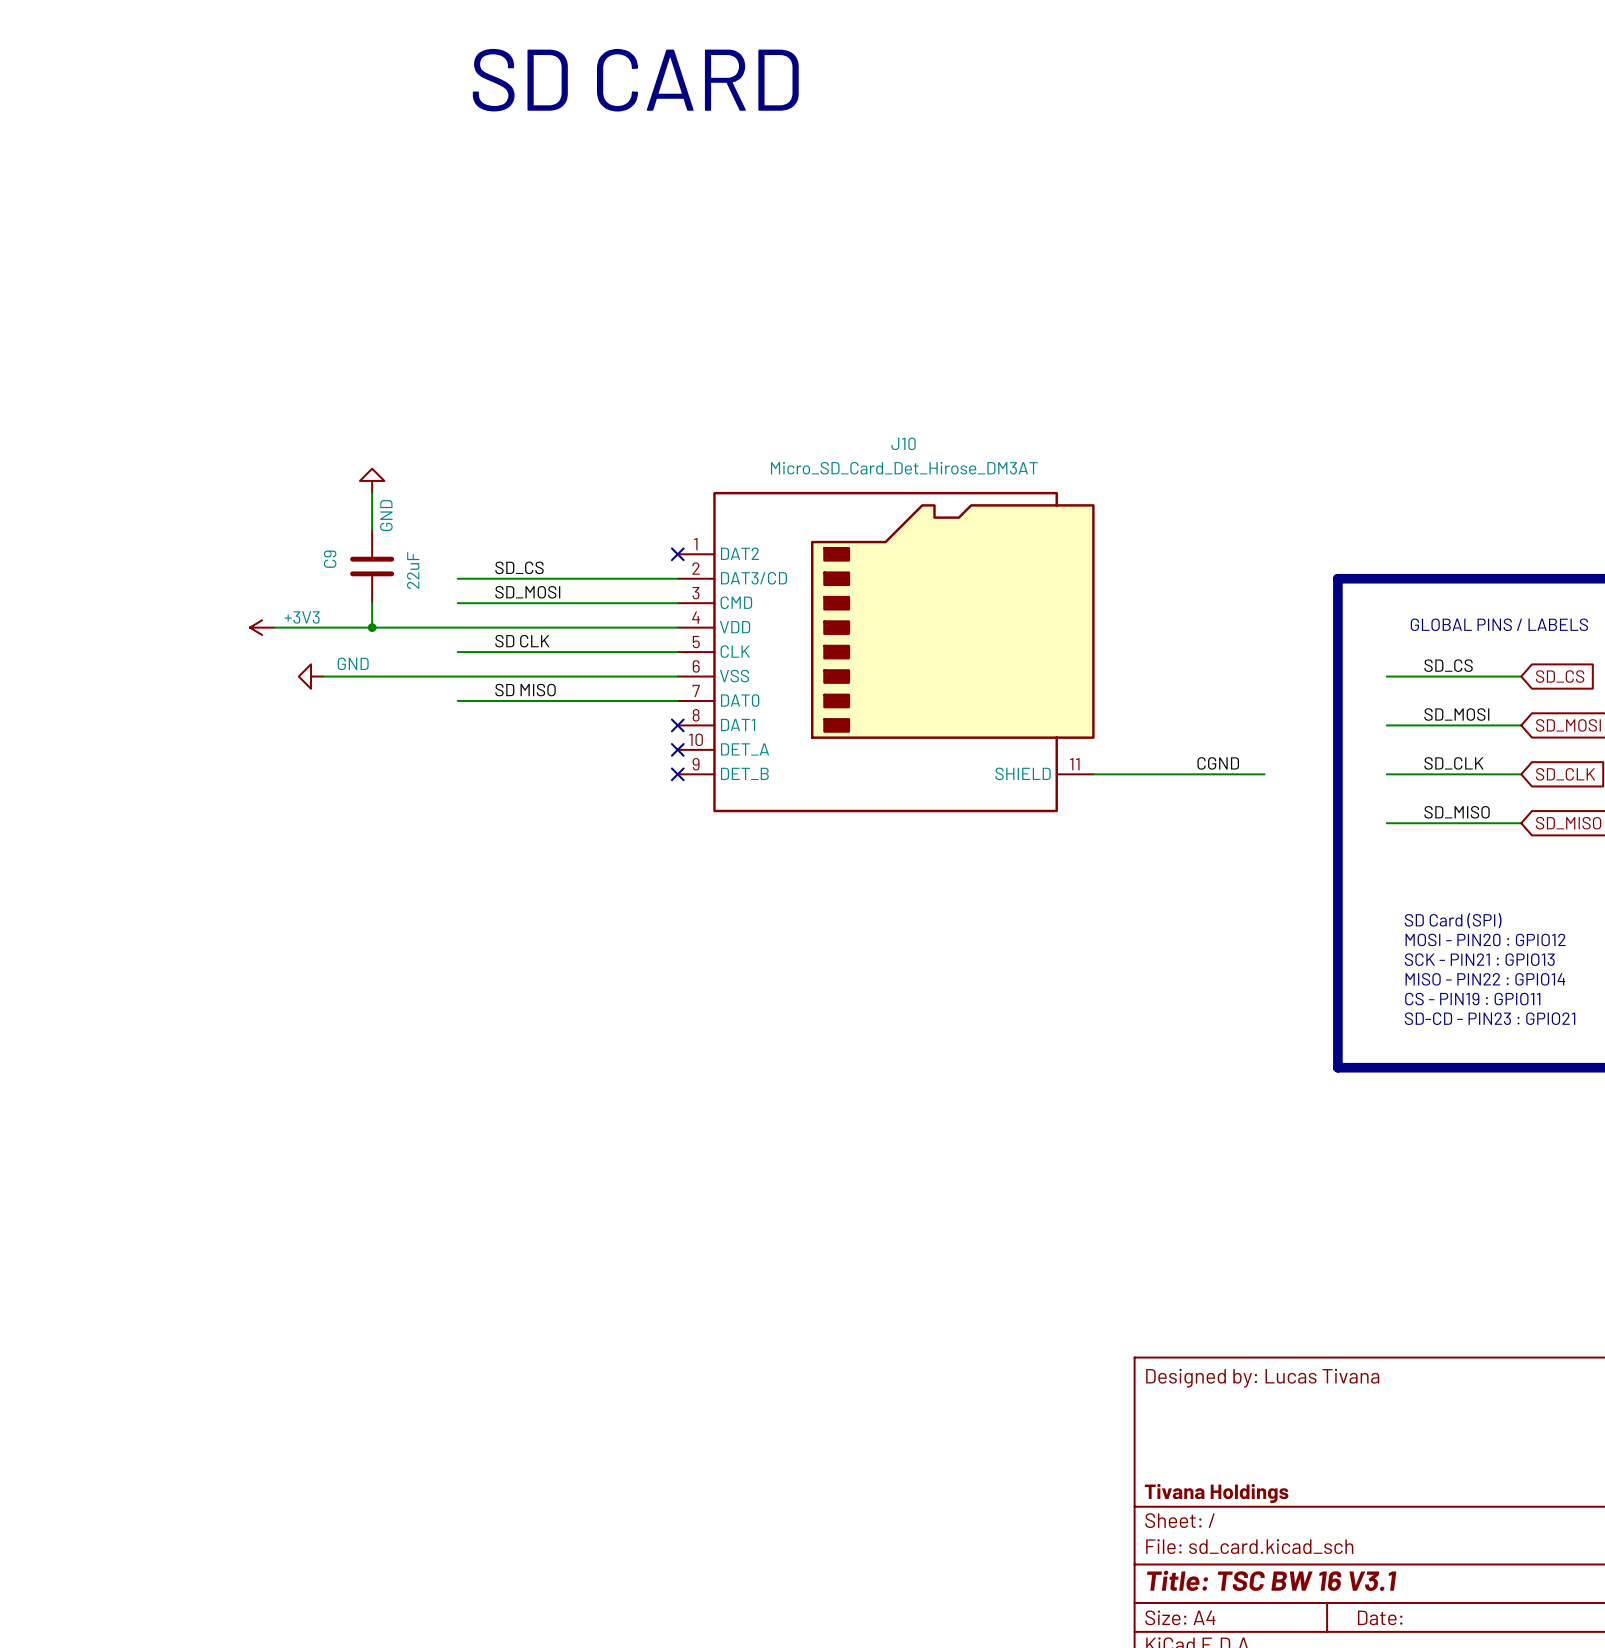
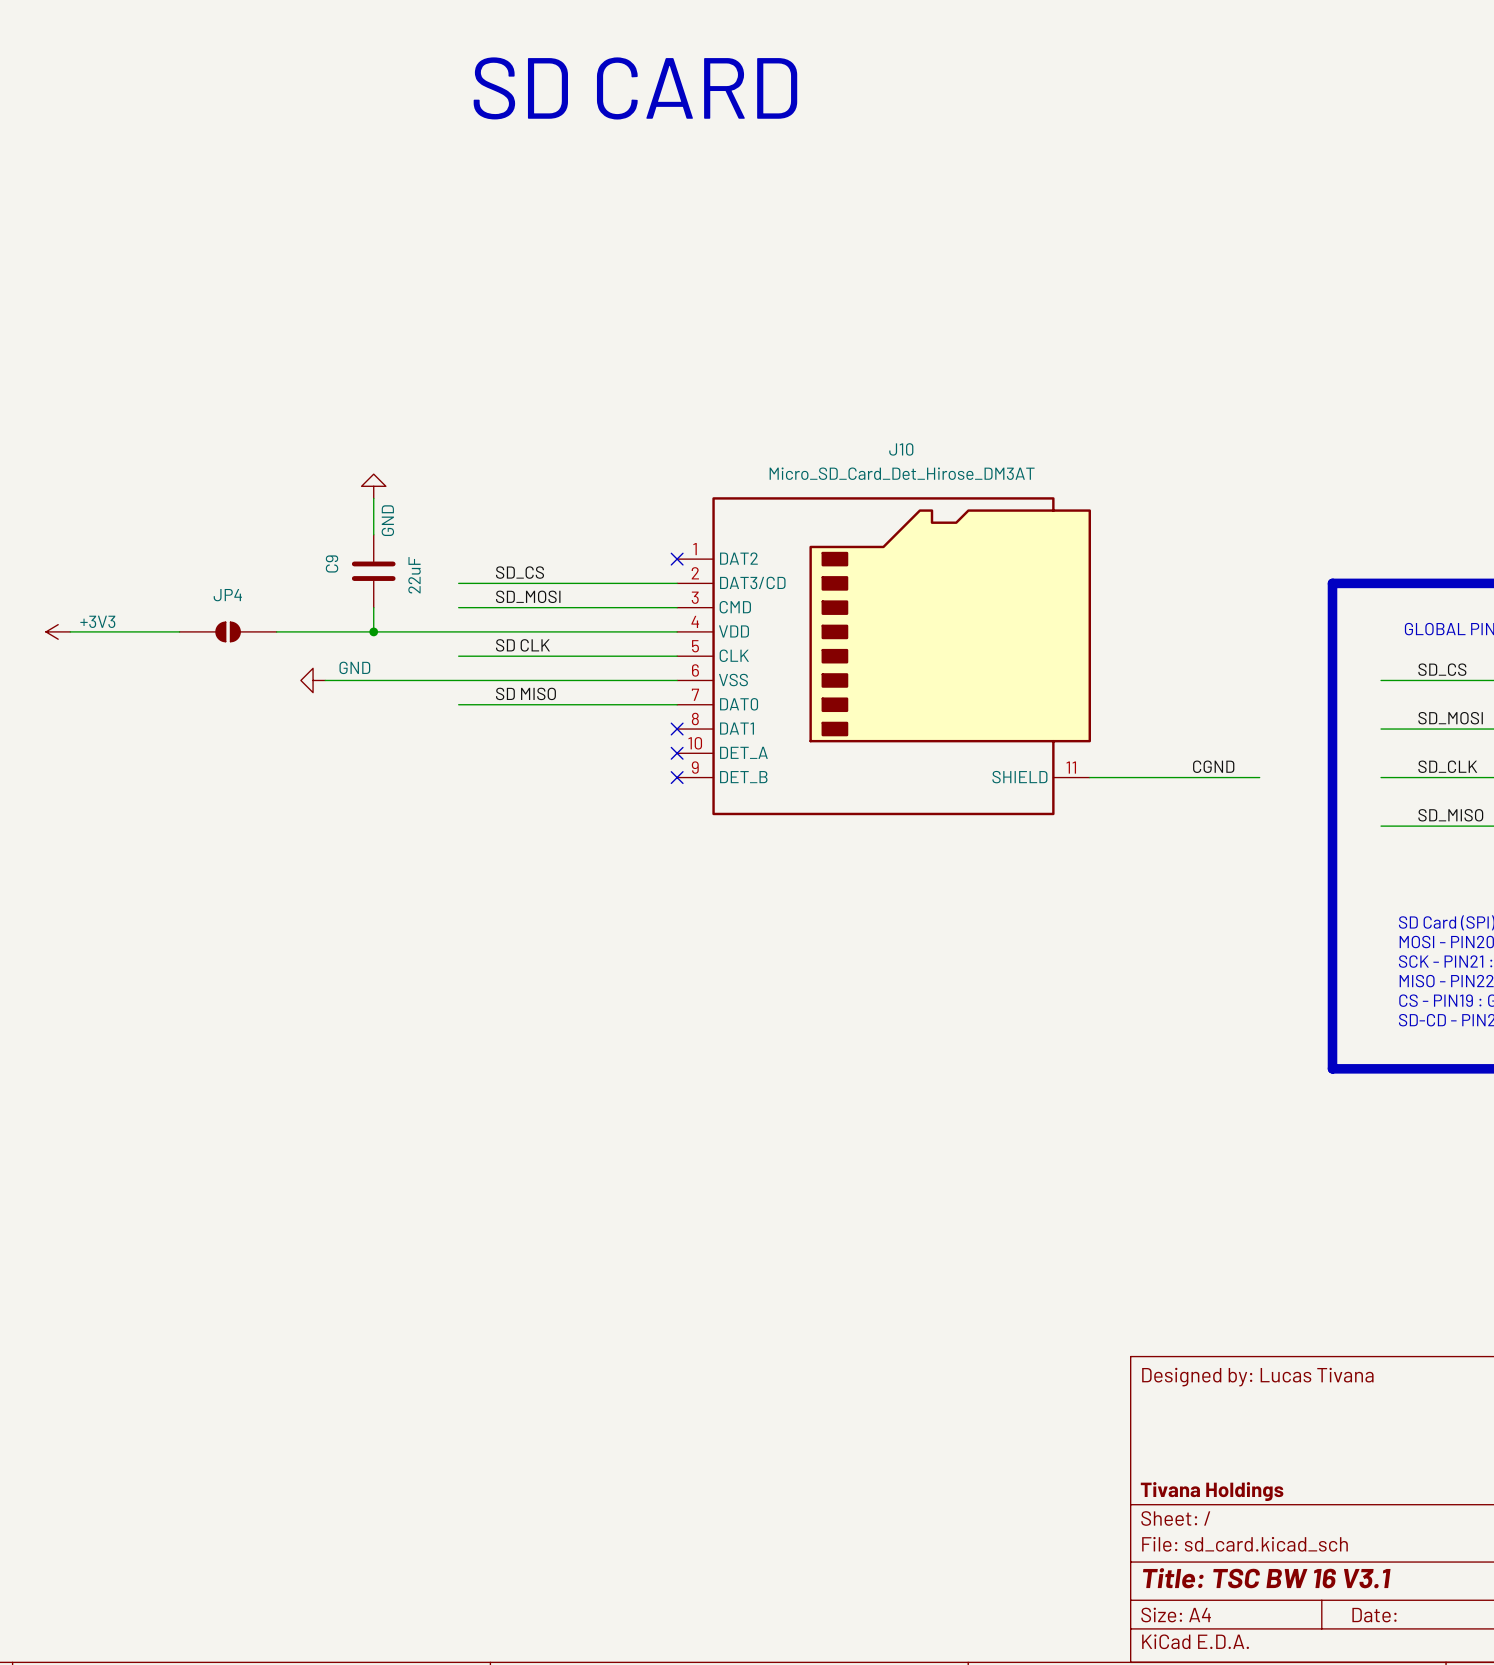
wire: none -> (70, 631) (179, 631)
JP4: none -> (228, 631)
power symbol position: +3V3 (262, 627) -> +3V3 (58, 631)

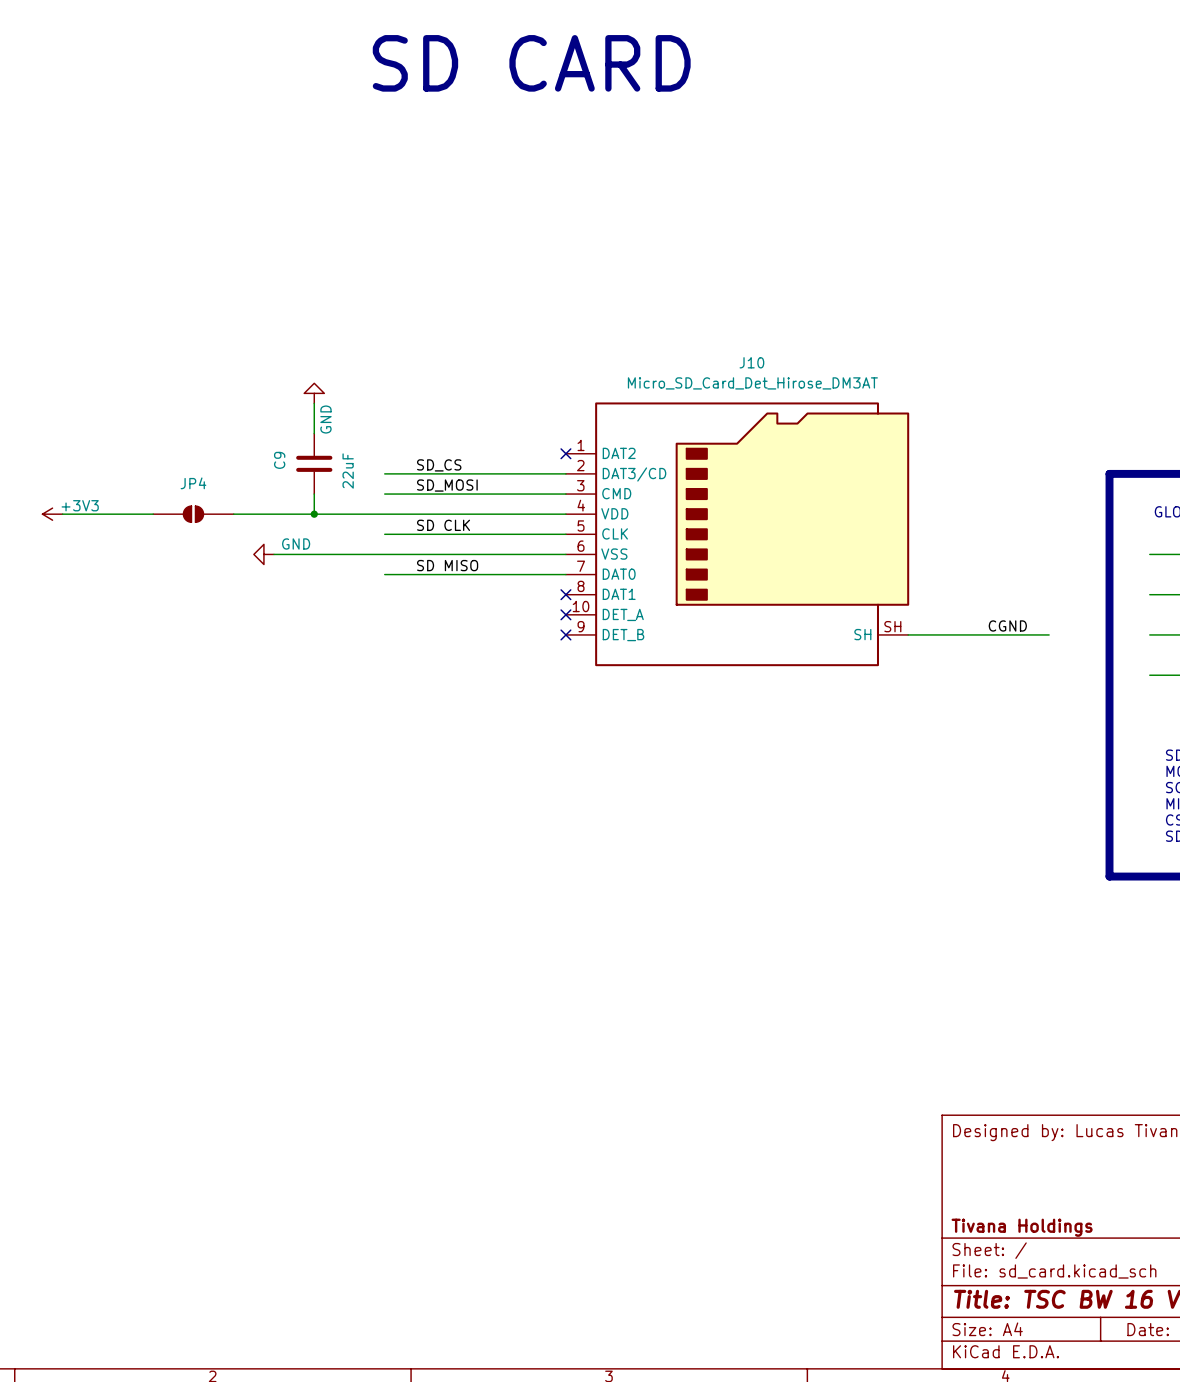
J10 pin number: 11 (1071, 767) -> SH (892, 626)
J10 pin name: SHIELD (1019, 777) -> SH (862, 634)

